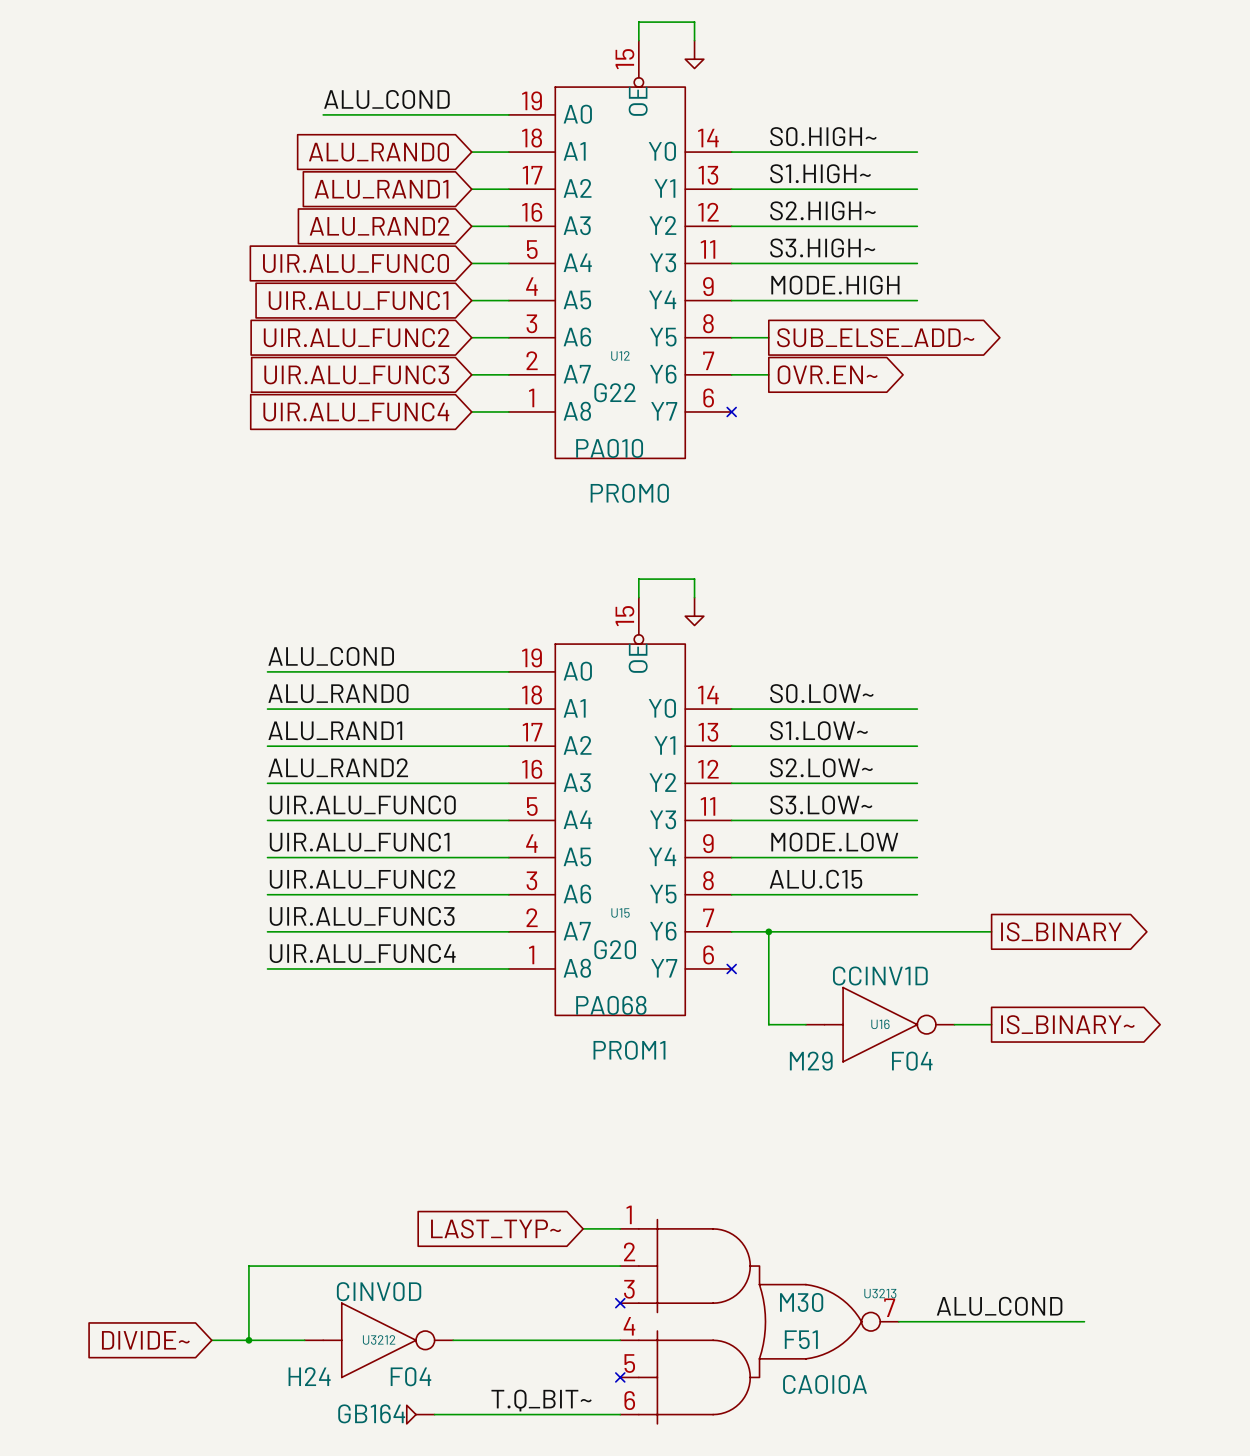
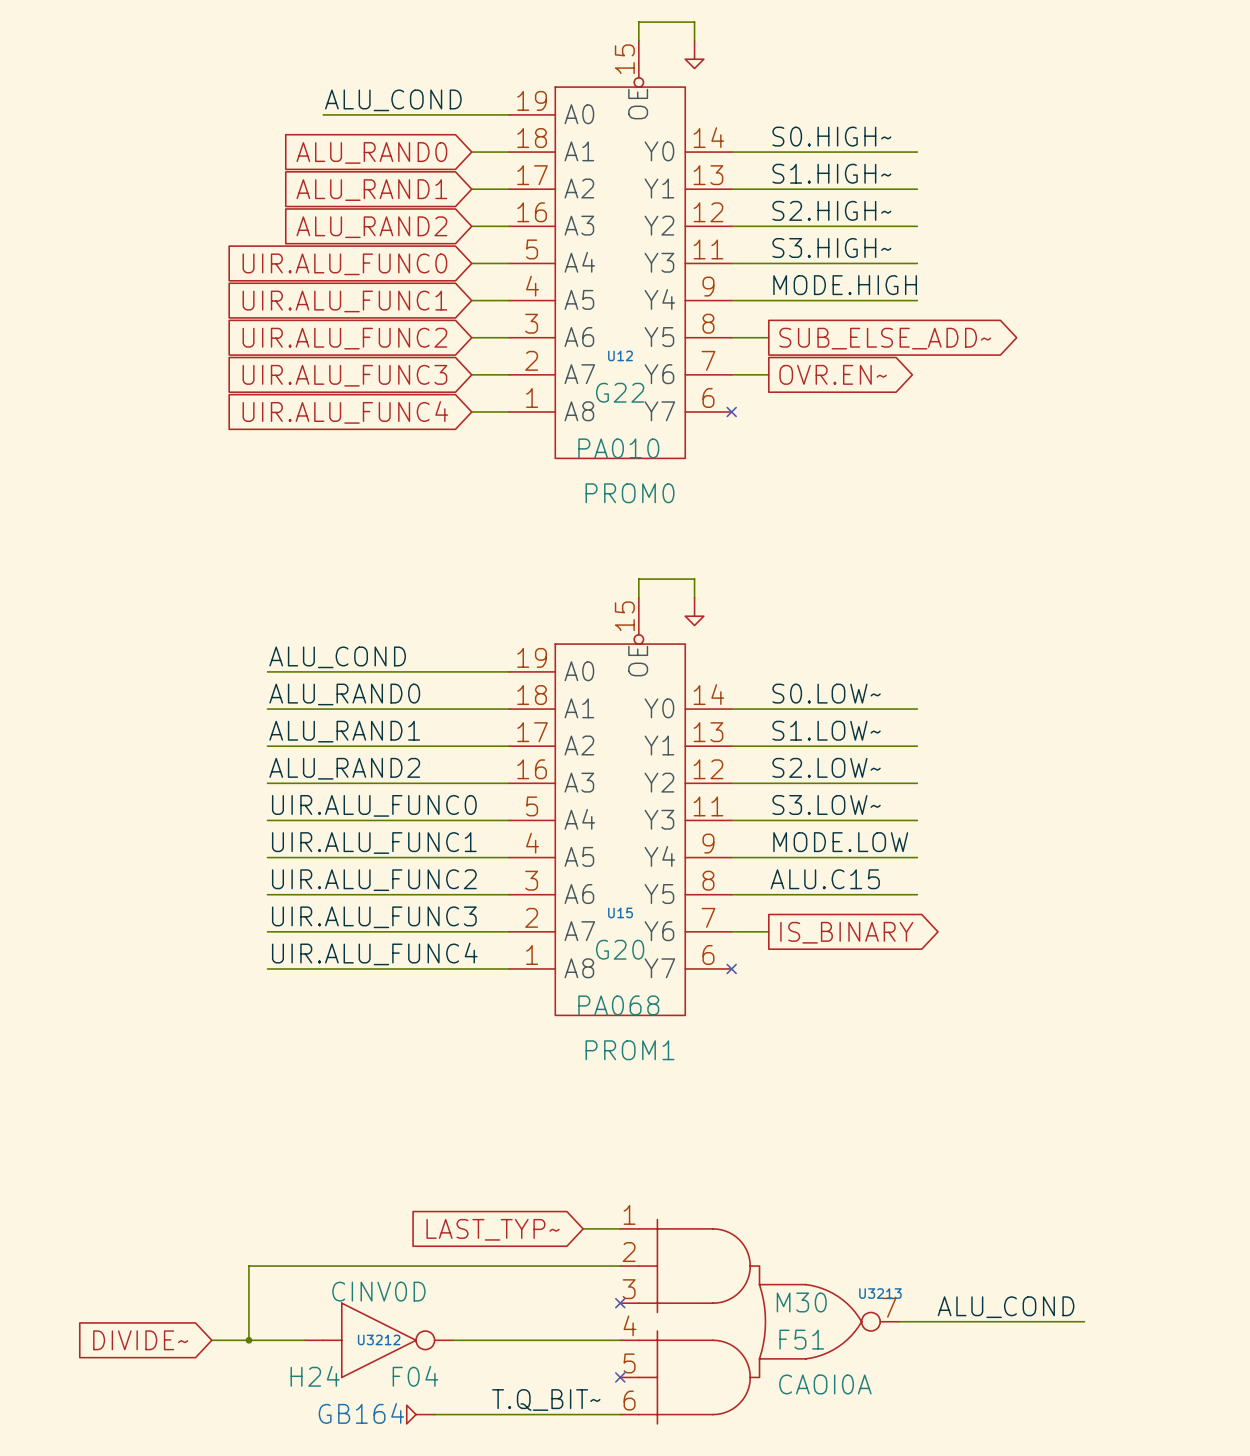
junction: (768, 931) -> none
global label: none -> IS_BINARY (846, 932)
wire: (991, 931) (768, 931) (768, 1024) (805, 1024) -> none
global label: IS_BINARY (1061, 931) -> none
U16: F04 (880, 1024) -> none
wire: (954, 1024) (991, 1024) -> none
global label: IS_BINARY~ (1067, 1024) -> none

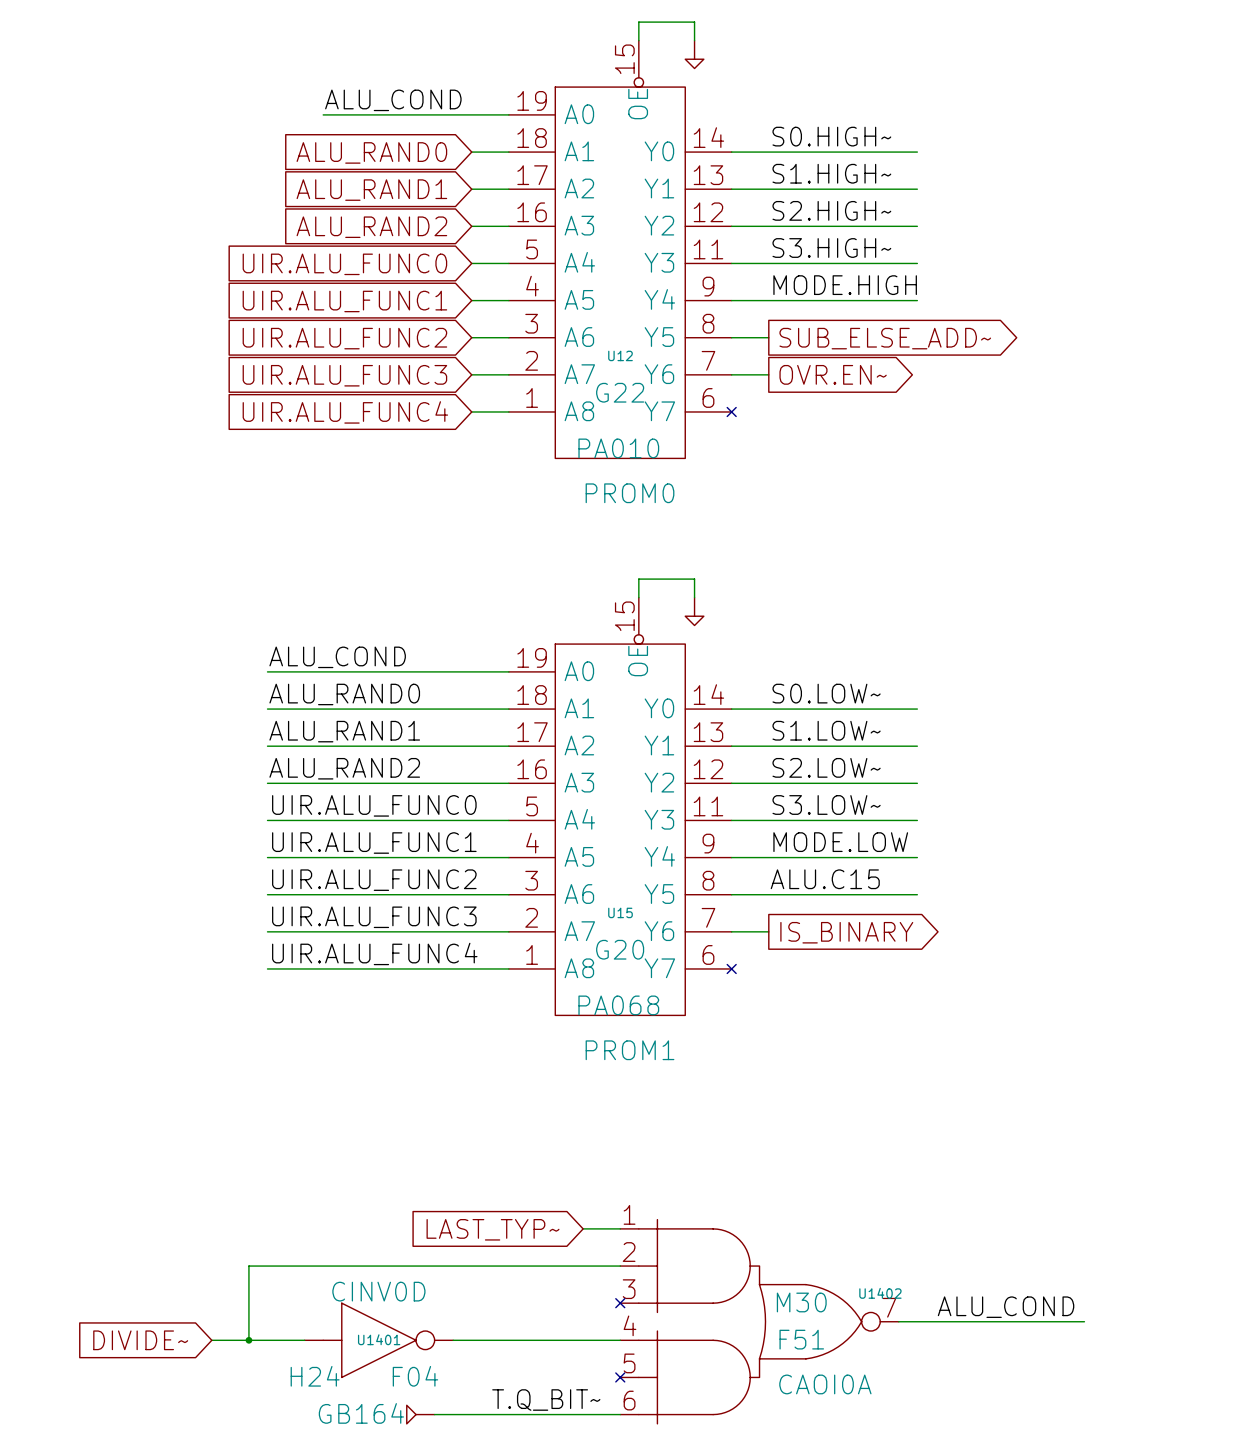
U3213 name: U3213 (880, 1293) -> U1402 (880, 1293)
U3212 name: U3212 (379, 1339) -> U1401 (379, 1339)

